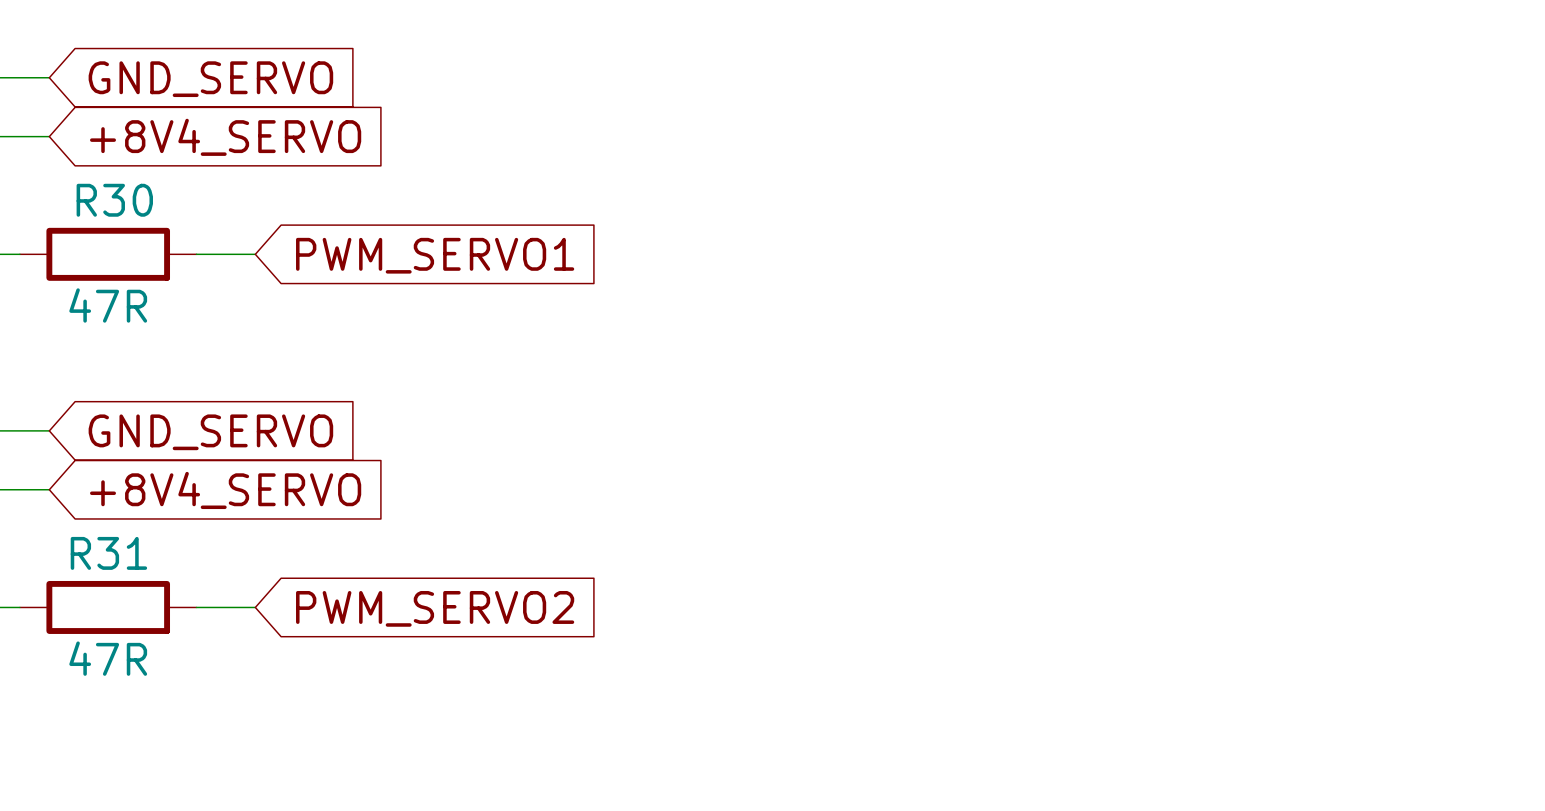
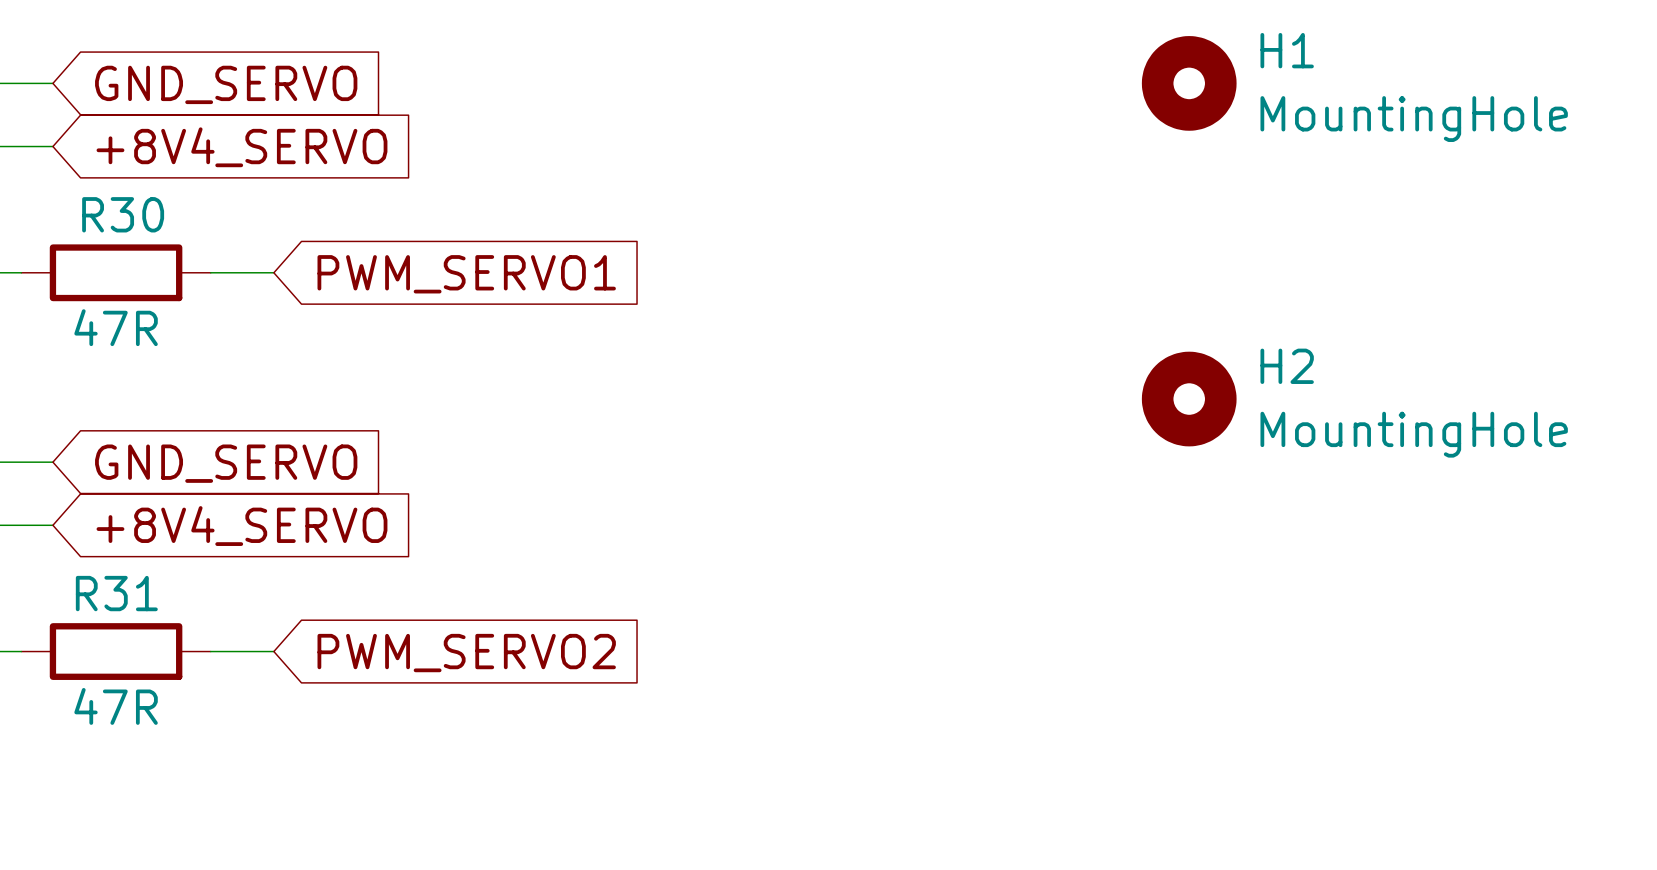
H1: none -> MountingHole (1189, 83)
H2: none -> MountingHole (1189, 399)

